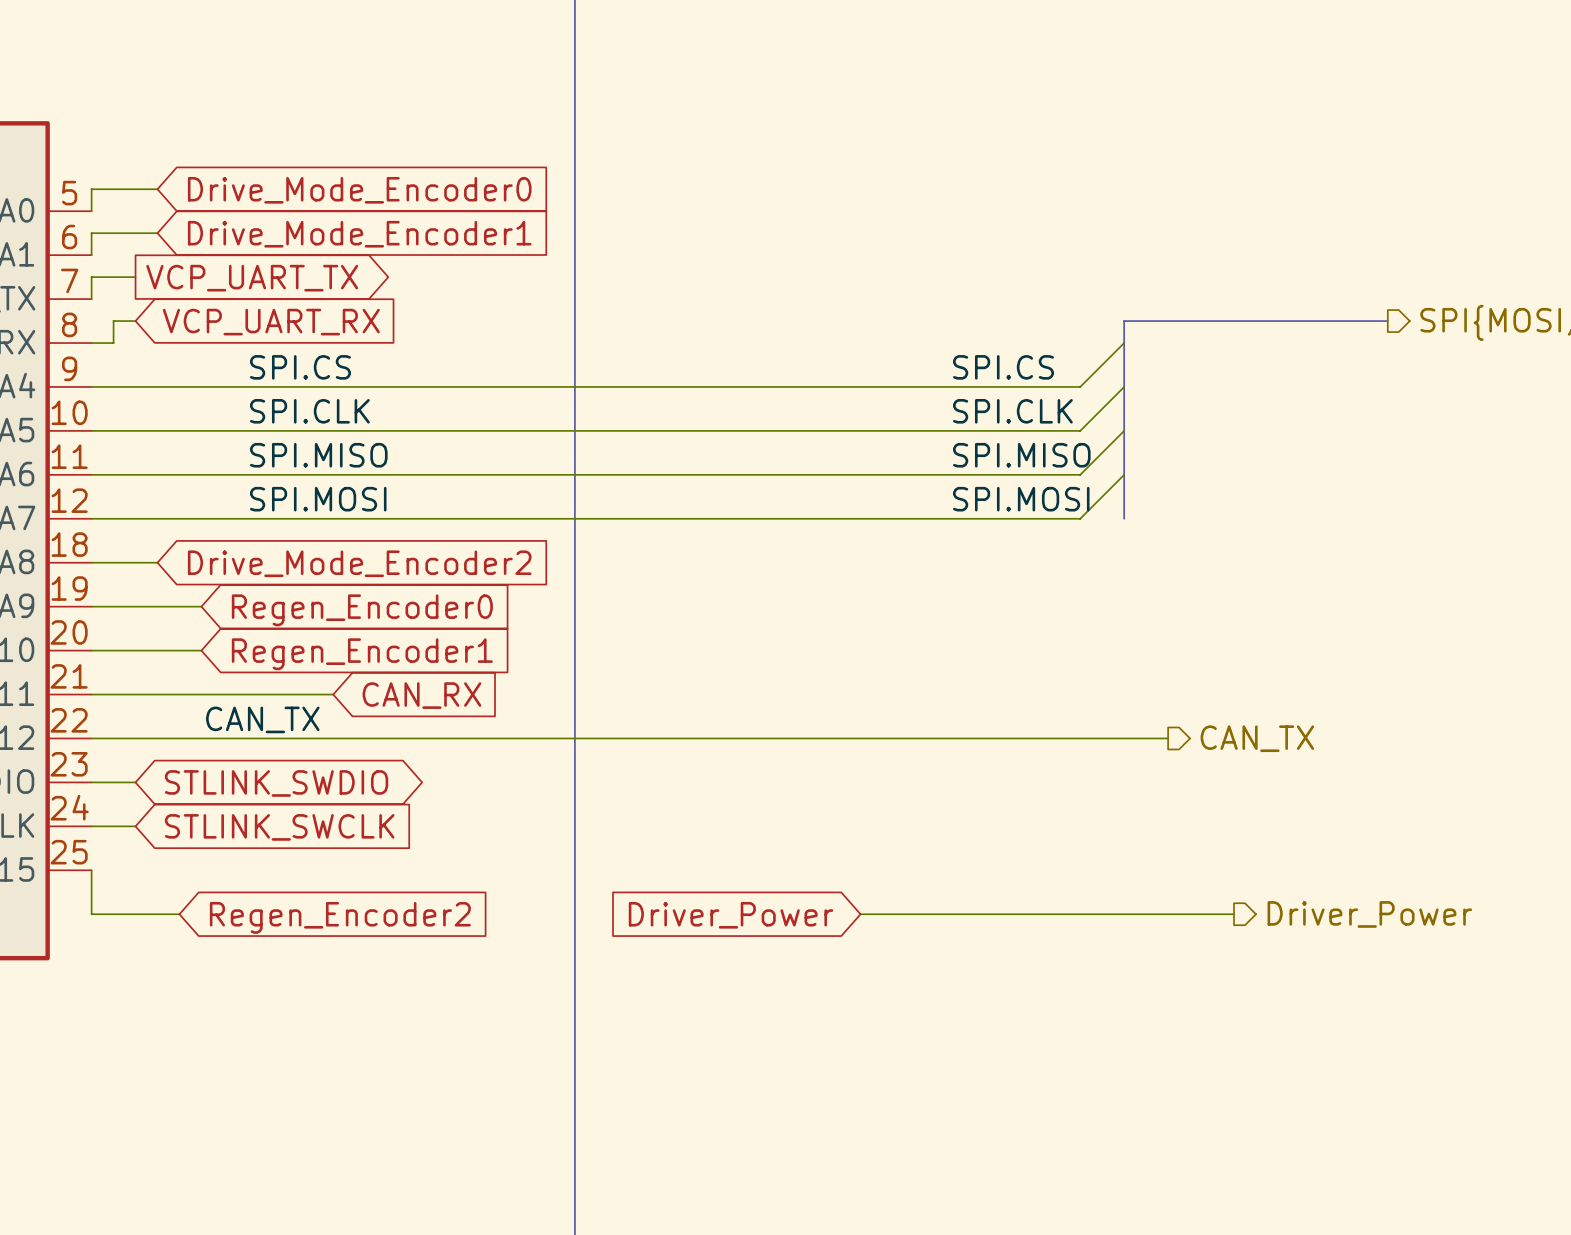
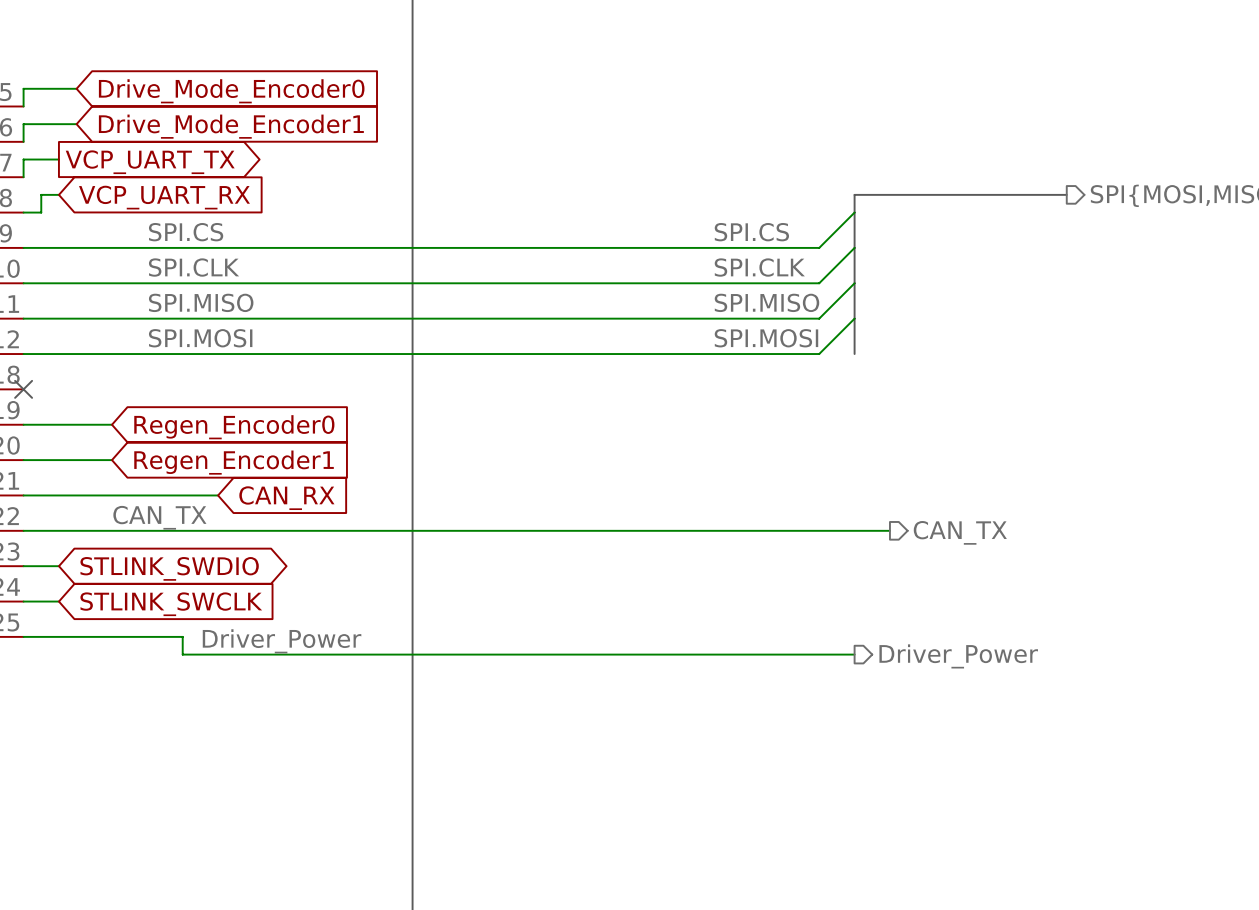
wire: (91, 562) (157, 562) -> none
no-connect mark: none -> (23, 389)
global label: Drive_Mode_Encoder2 (359, 563) -> none
wire: (91, 870) (91, 914) (179, 914) -> (23, 636) (182, 636) (182, 654) (854, 654)
label: none -> Driver_Power (282, 641)
wire: (860, 914) (1234, 914) -> none
hierarchical label position: Driver_Power (1369, 914) -> Driver_Power (958, 656)
global label: Driver_Power (731, 915) -> none
global label: Regen_Encoder2 (340, 917) -> none

